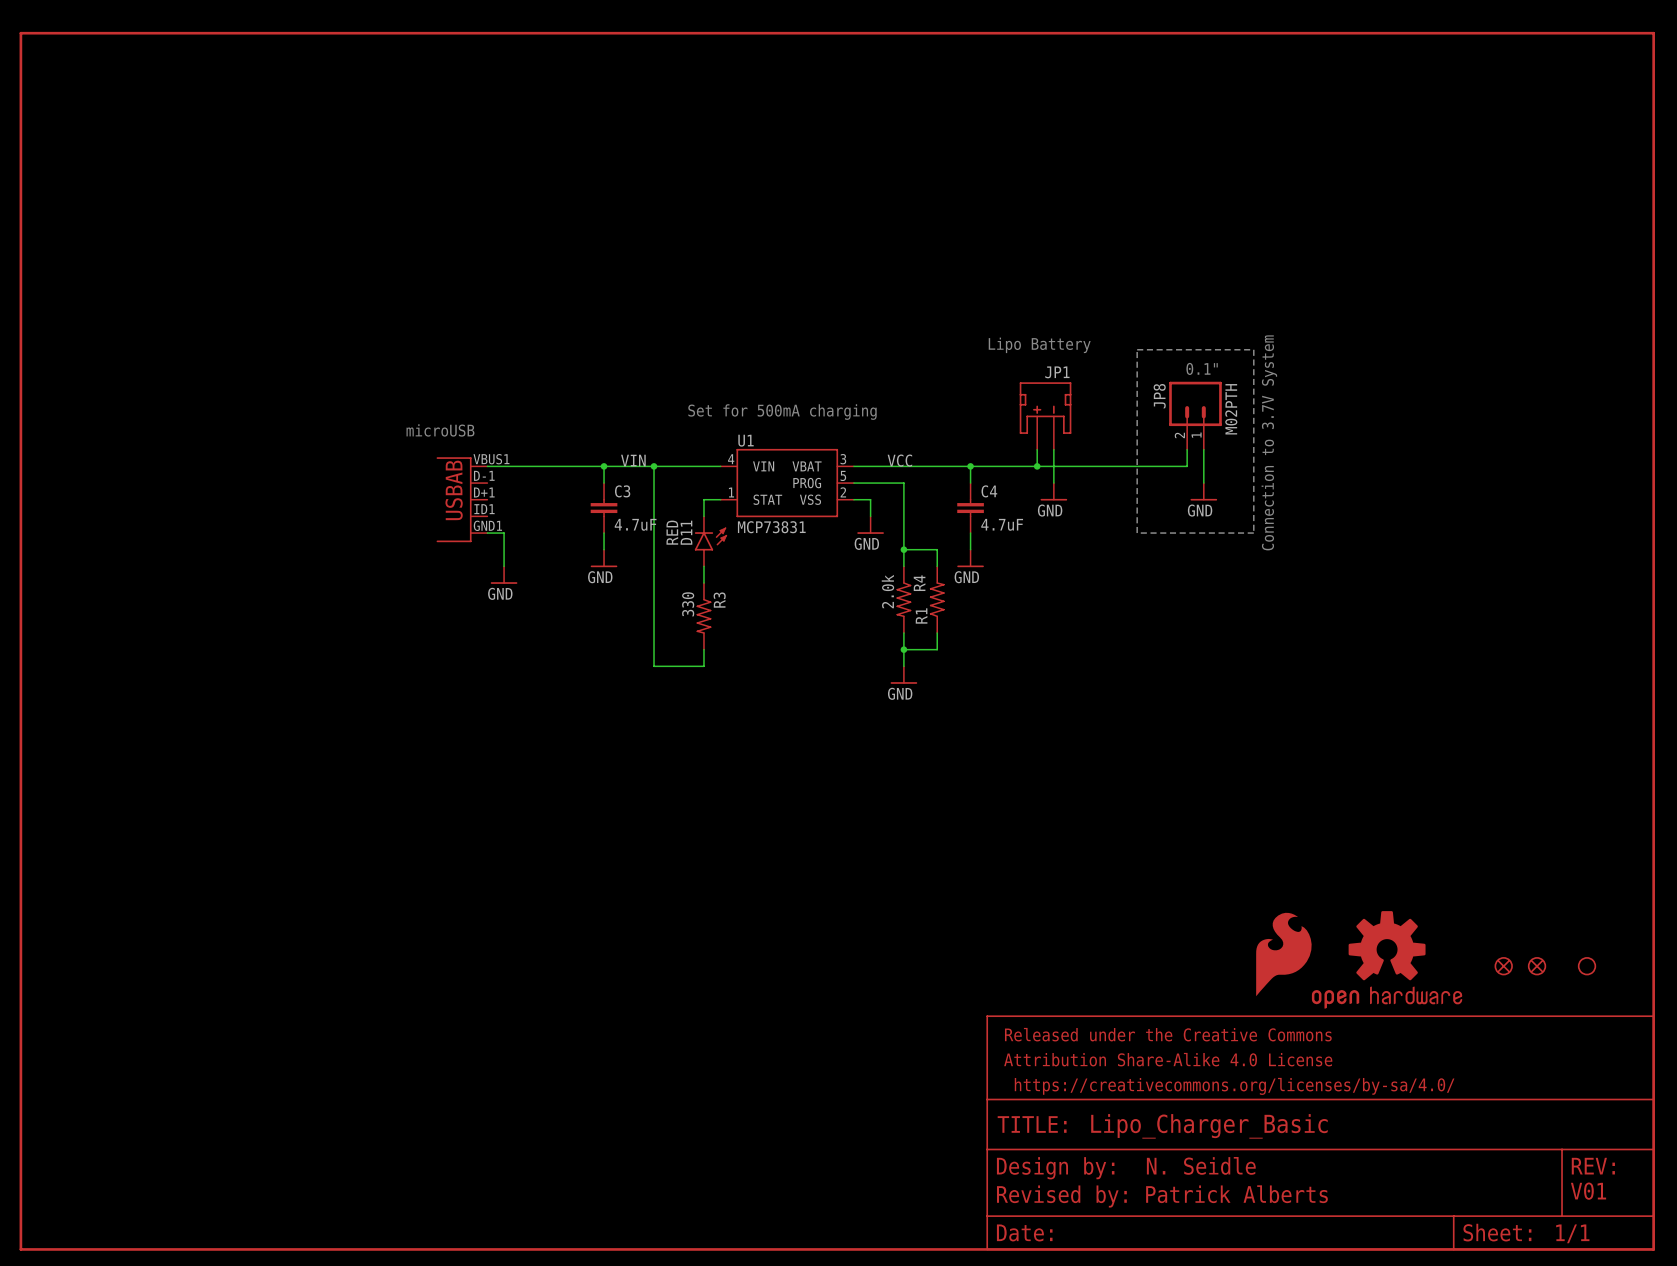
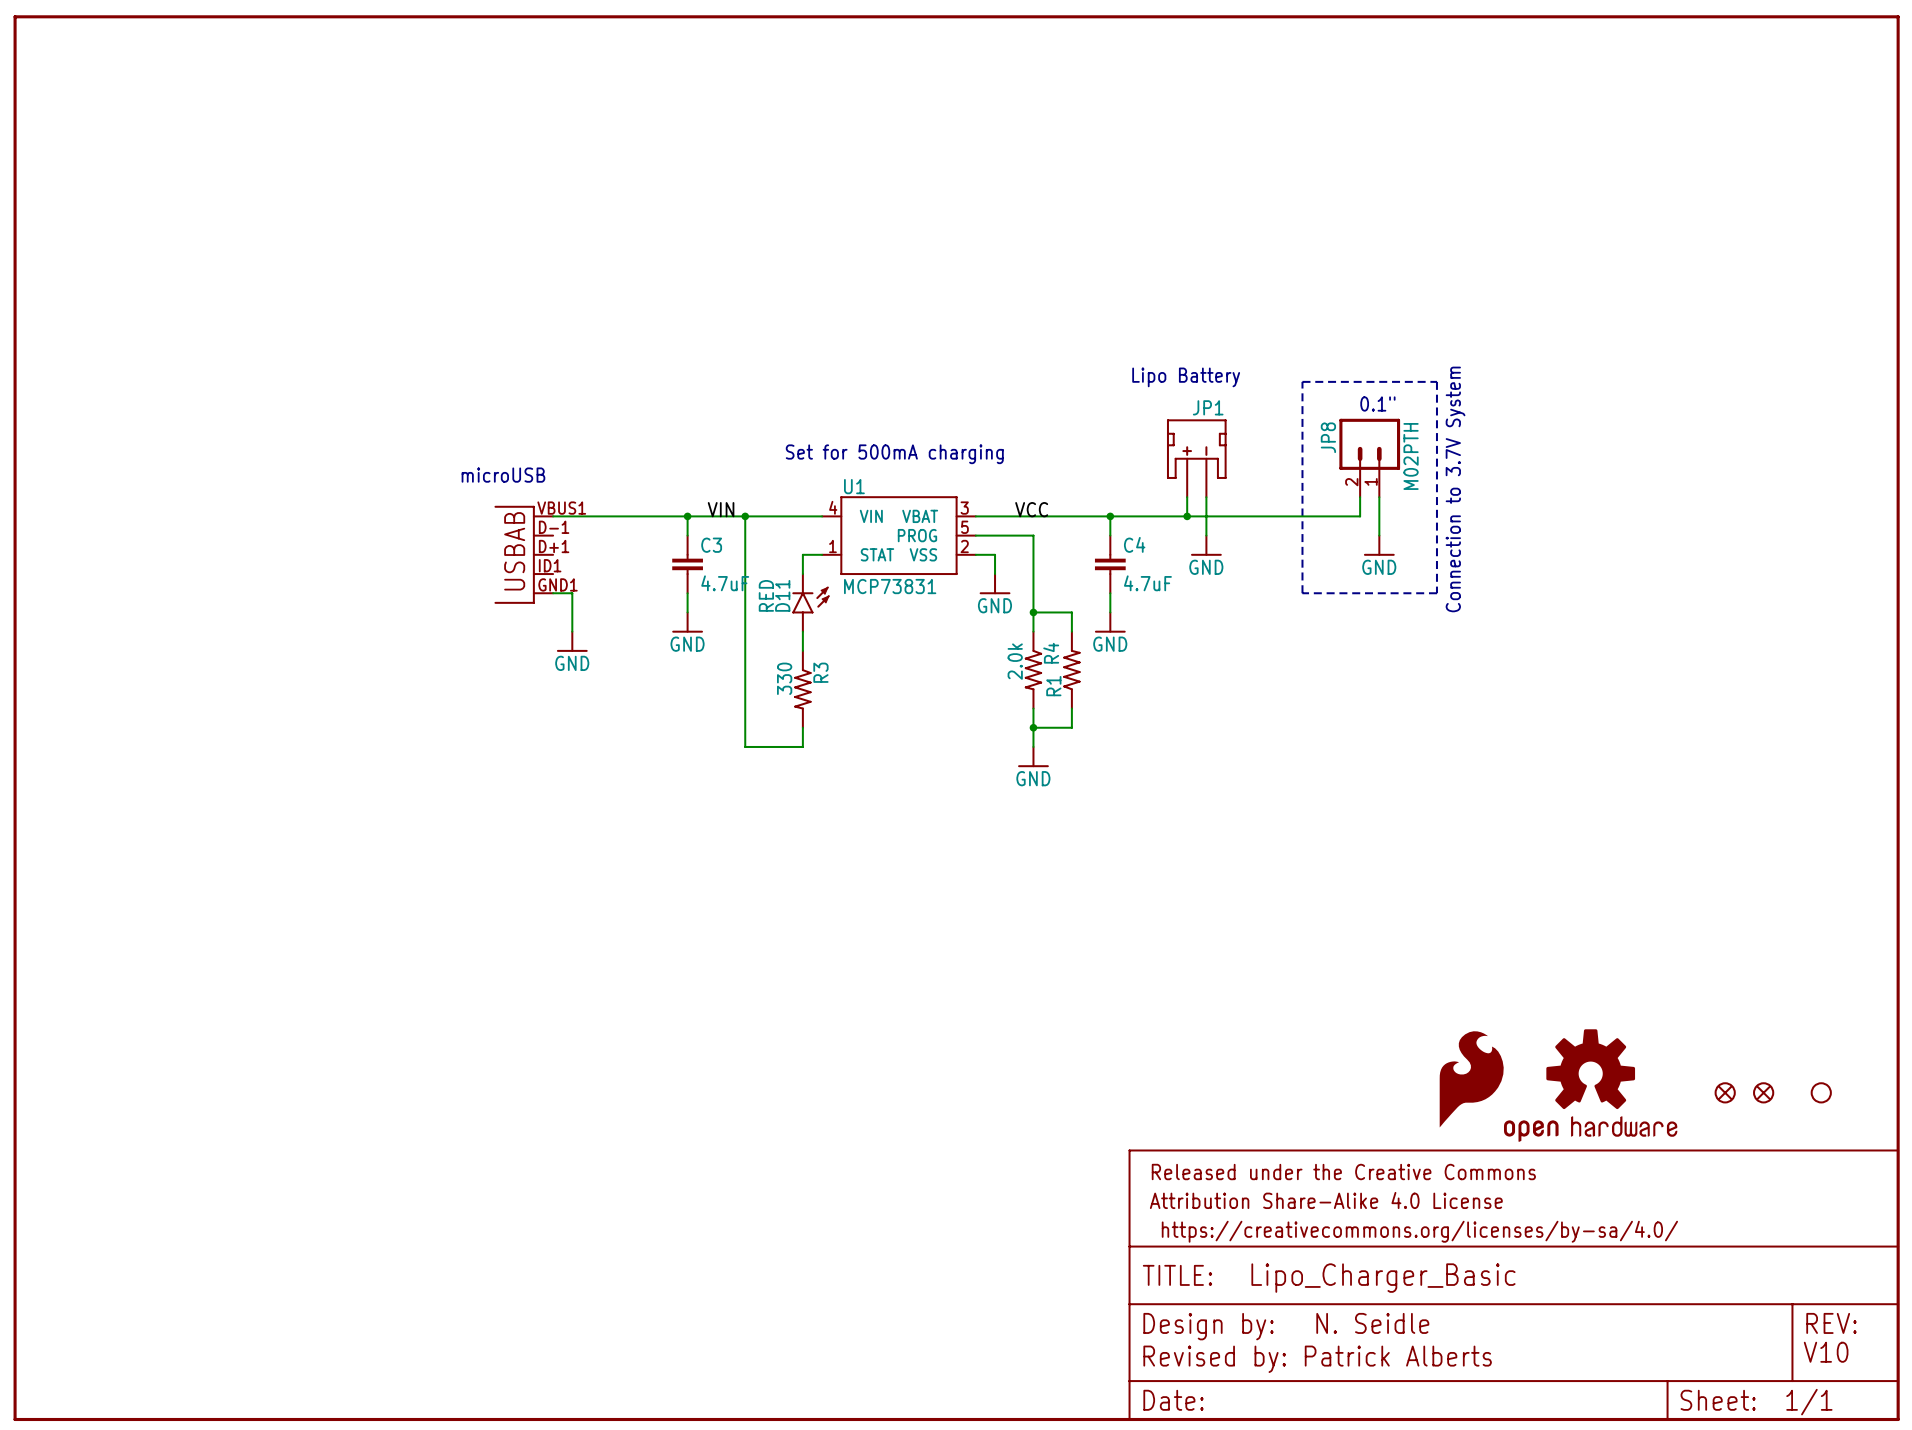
text: V01 (1588, 1191) -> V10 (1826, 1352)

